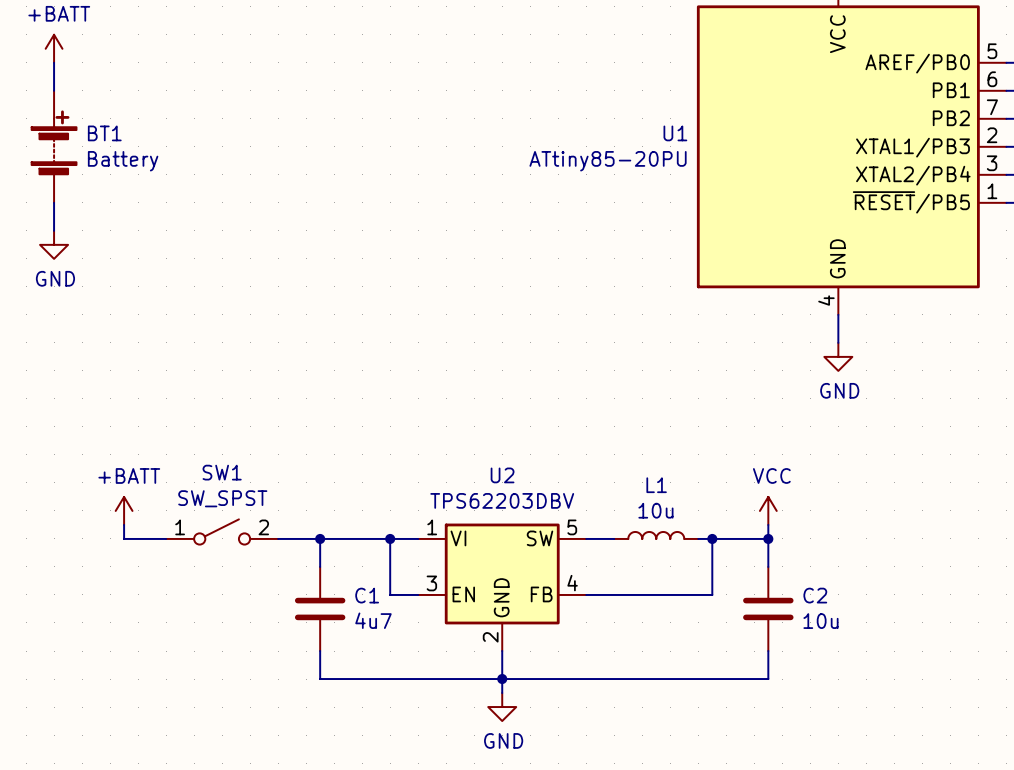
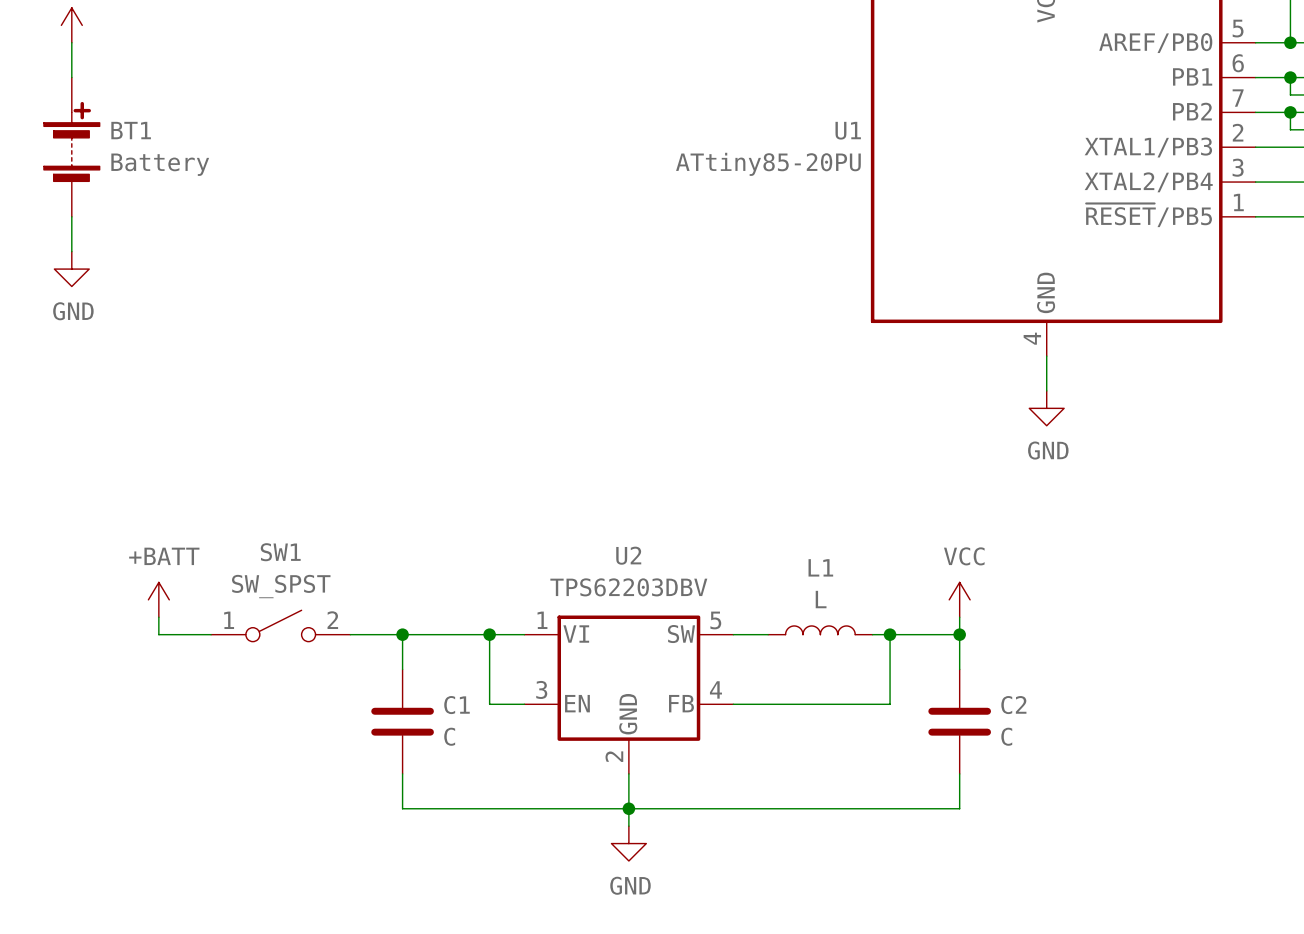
L1 value: 10u (655, 510) -> L (821, 599)
C1 value: 4u7 (373, 620) -> C (449, 736)
C2 value: 10u (820, 621) -> C (1006, 736)

